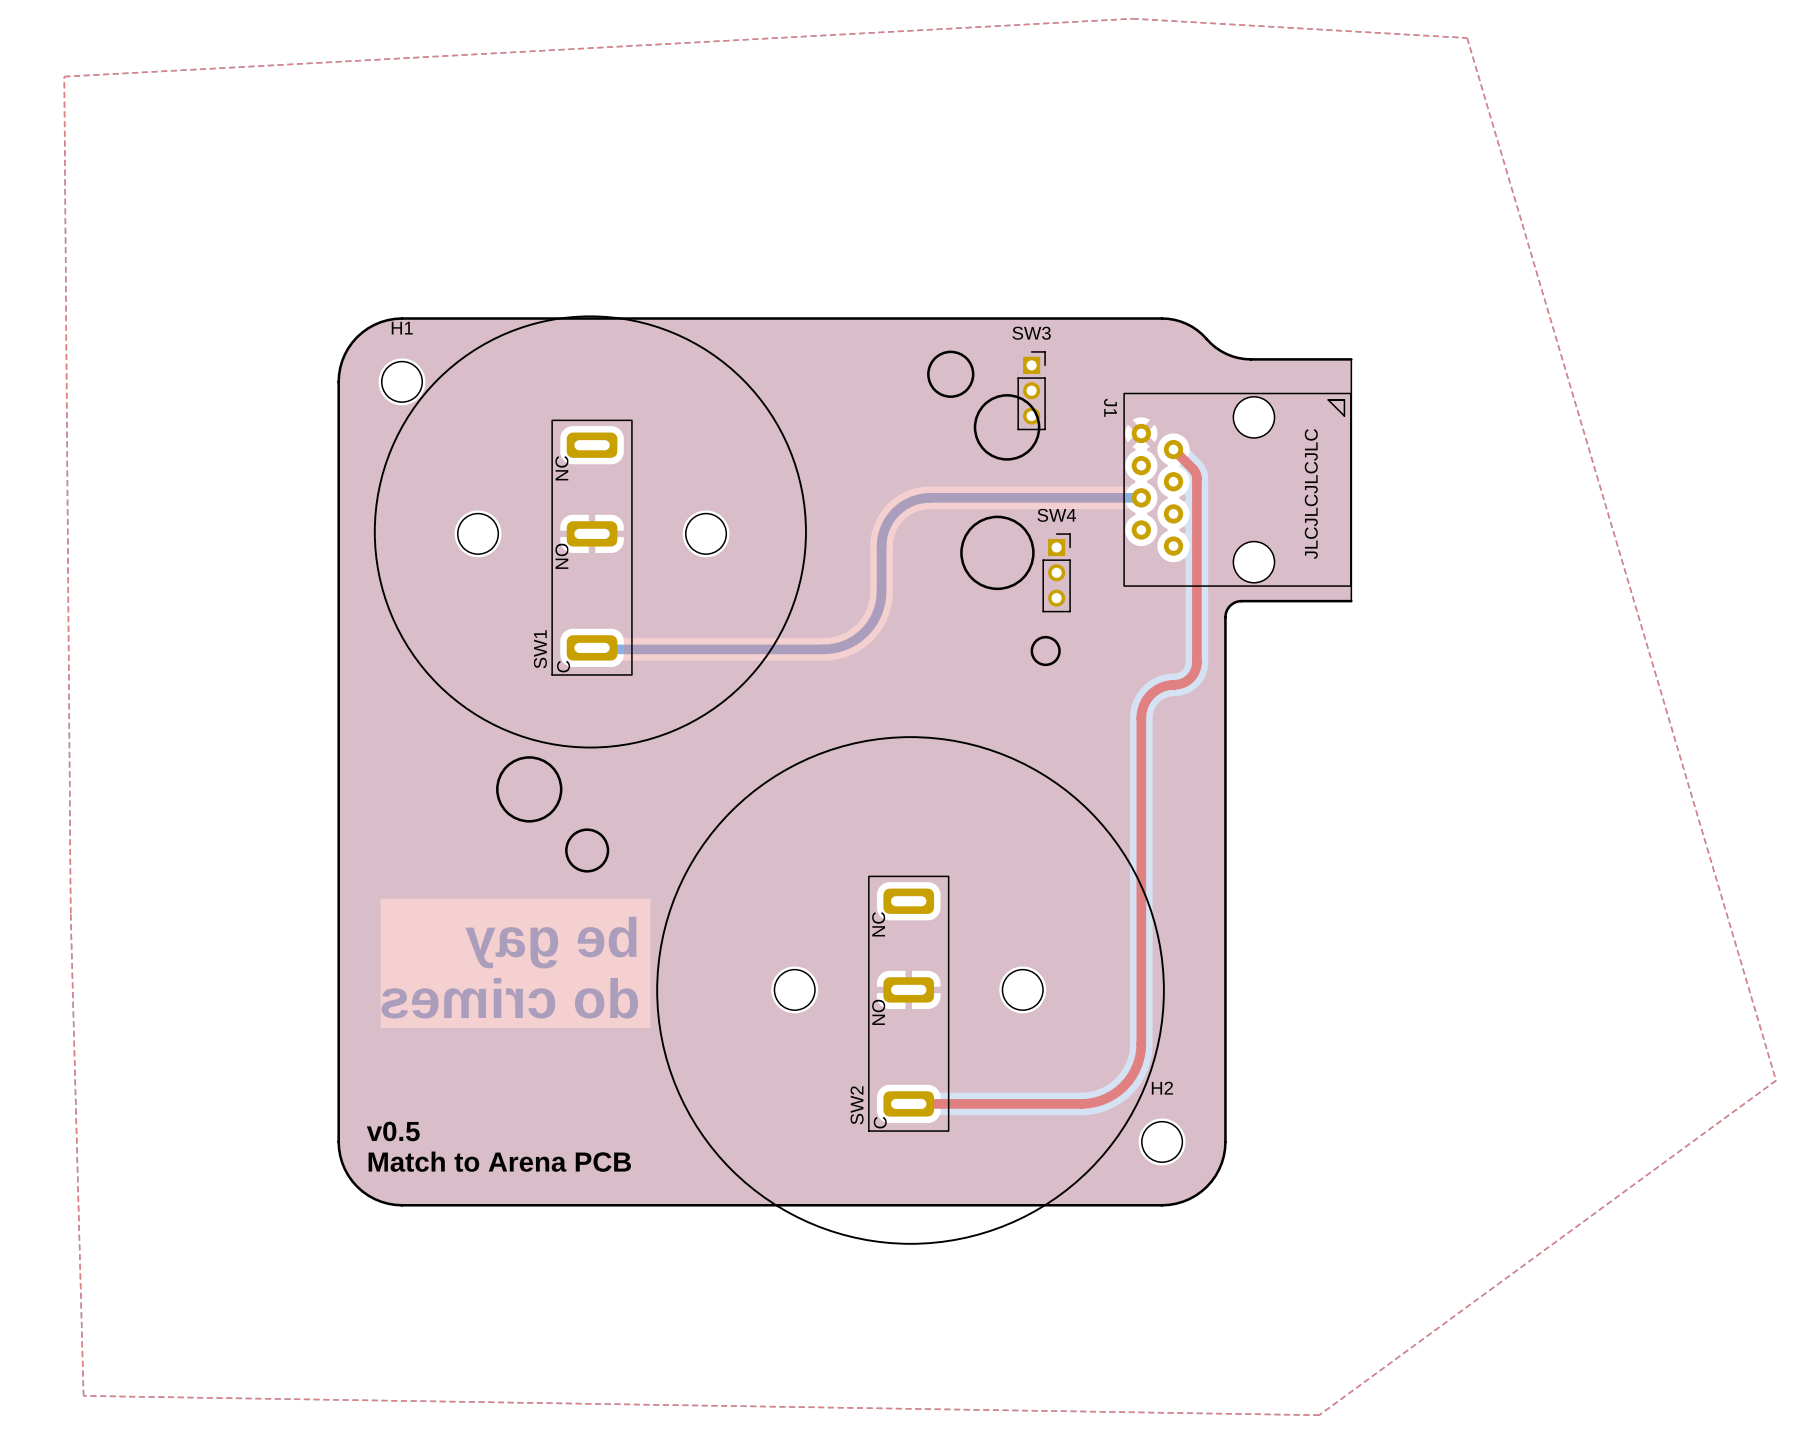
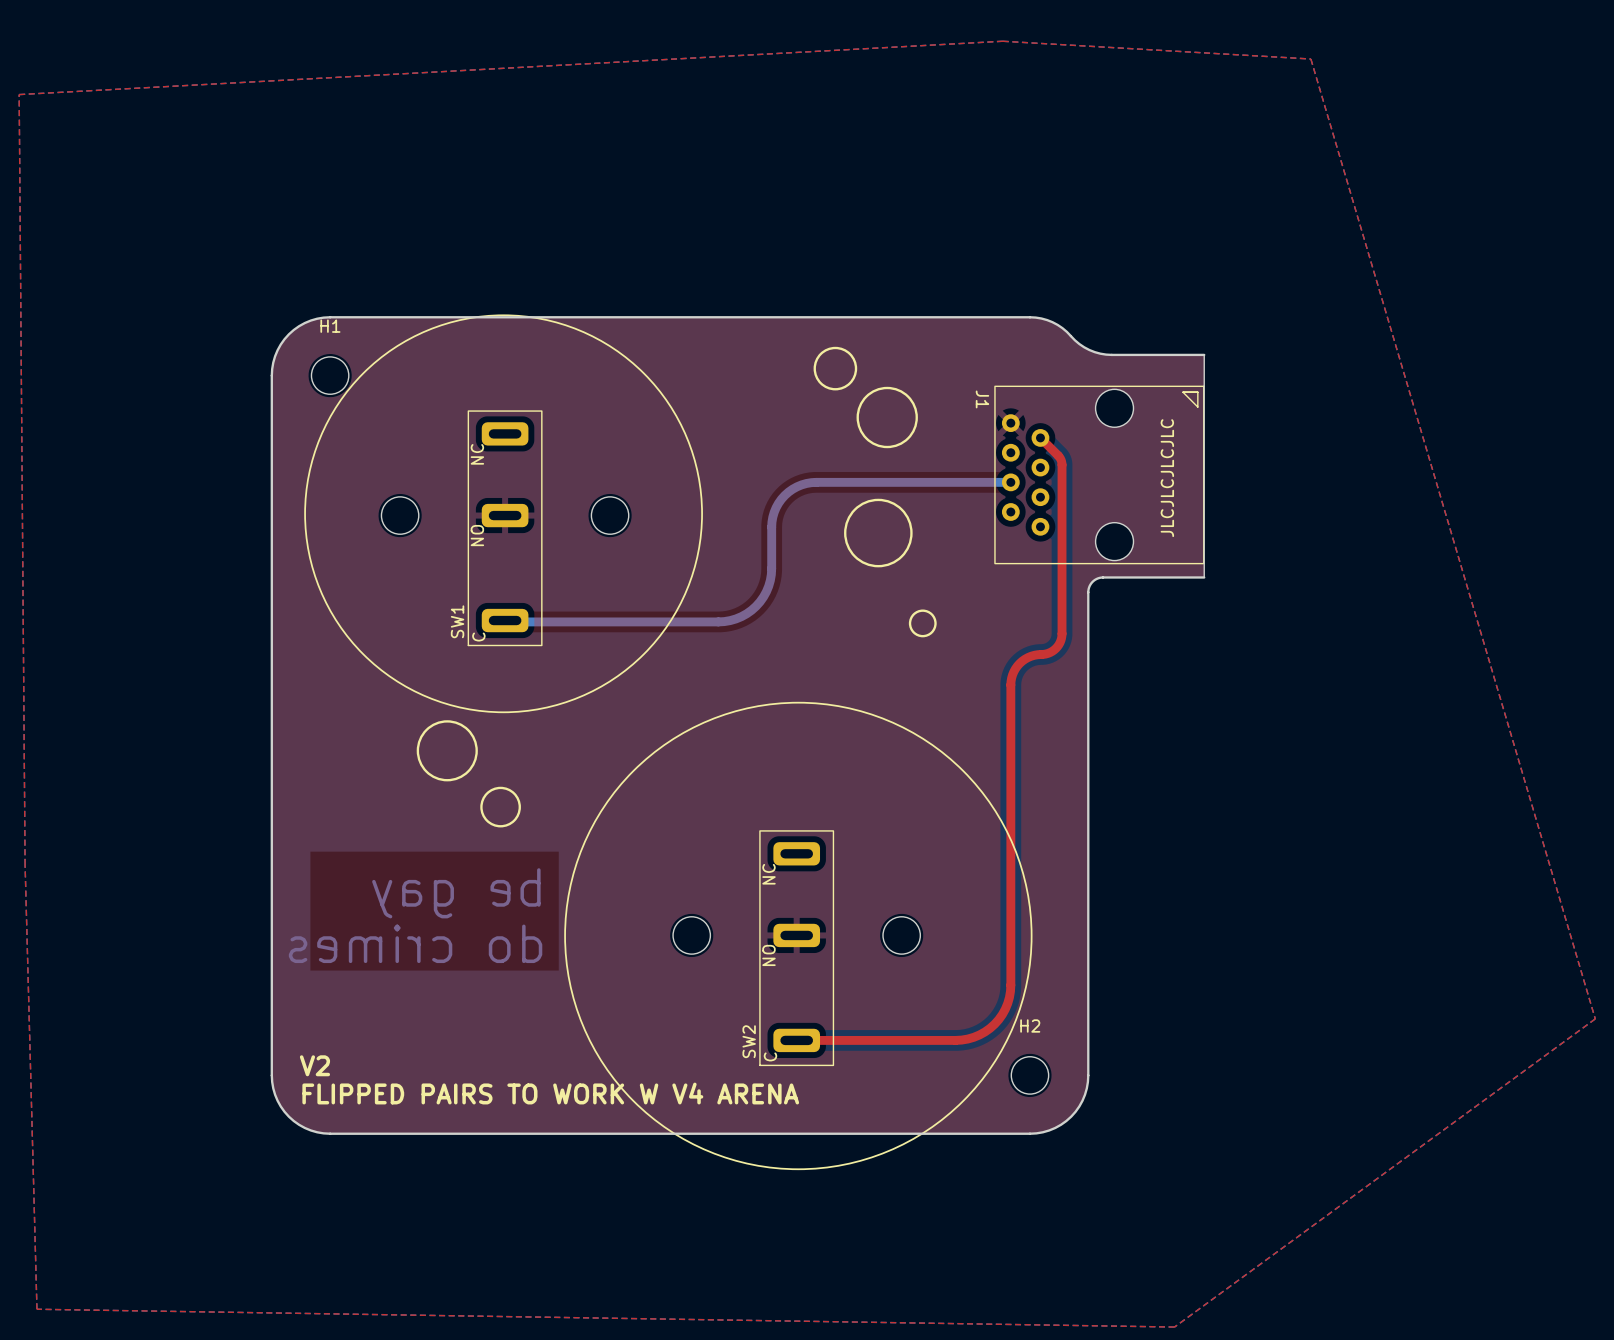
SW3: (1031, 390) -> none
SW4: (1056, 572) -> none
text: v0.5 (393, 1131) -> V2 (314, 1065)
text: Match to Arena PCB (499, 1161) -> FLIPPED PAIRS TO WORK W V4 ARENA (550, 1093)

